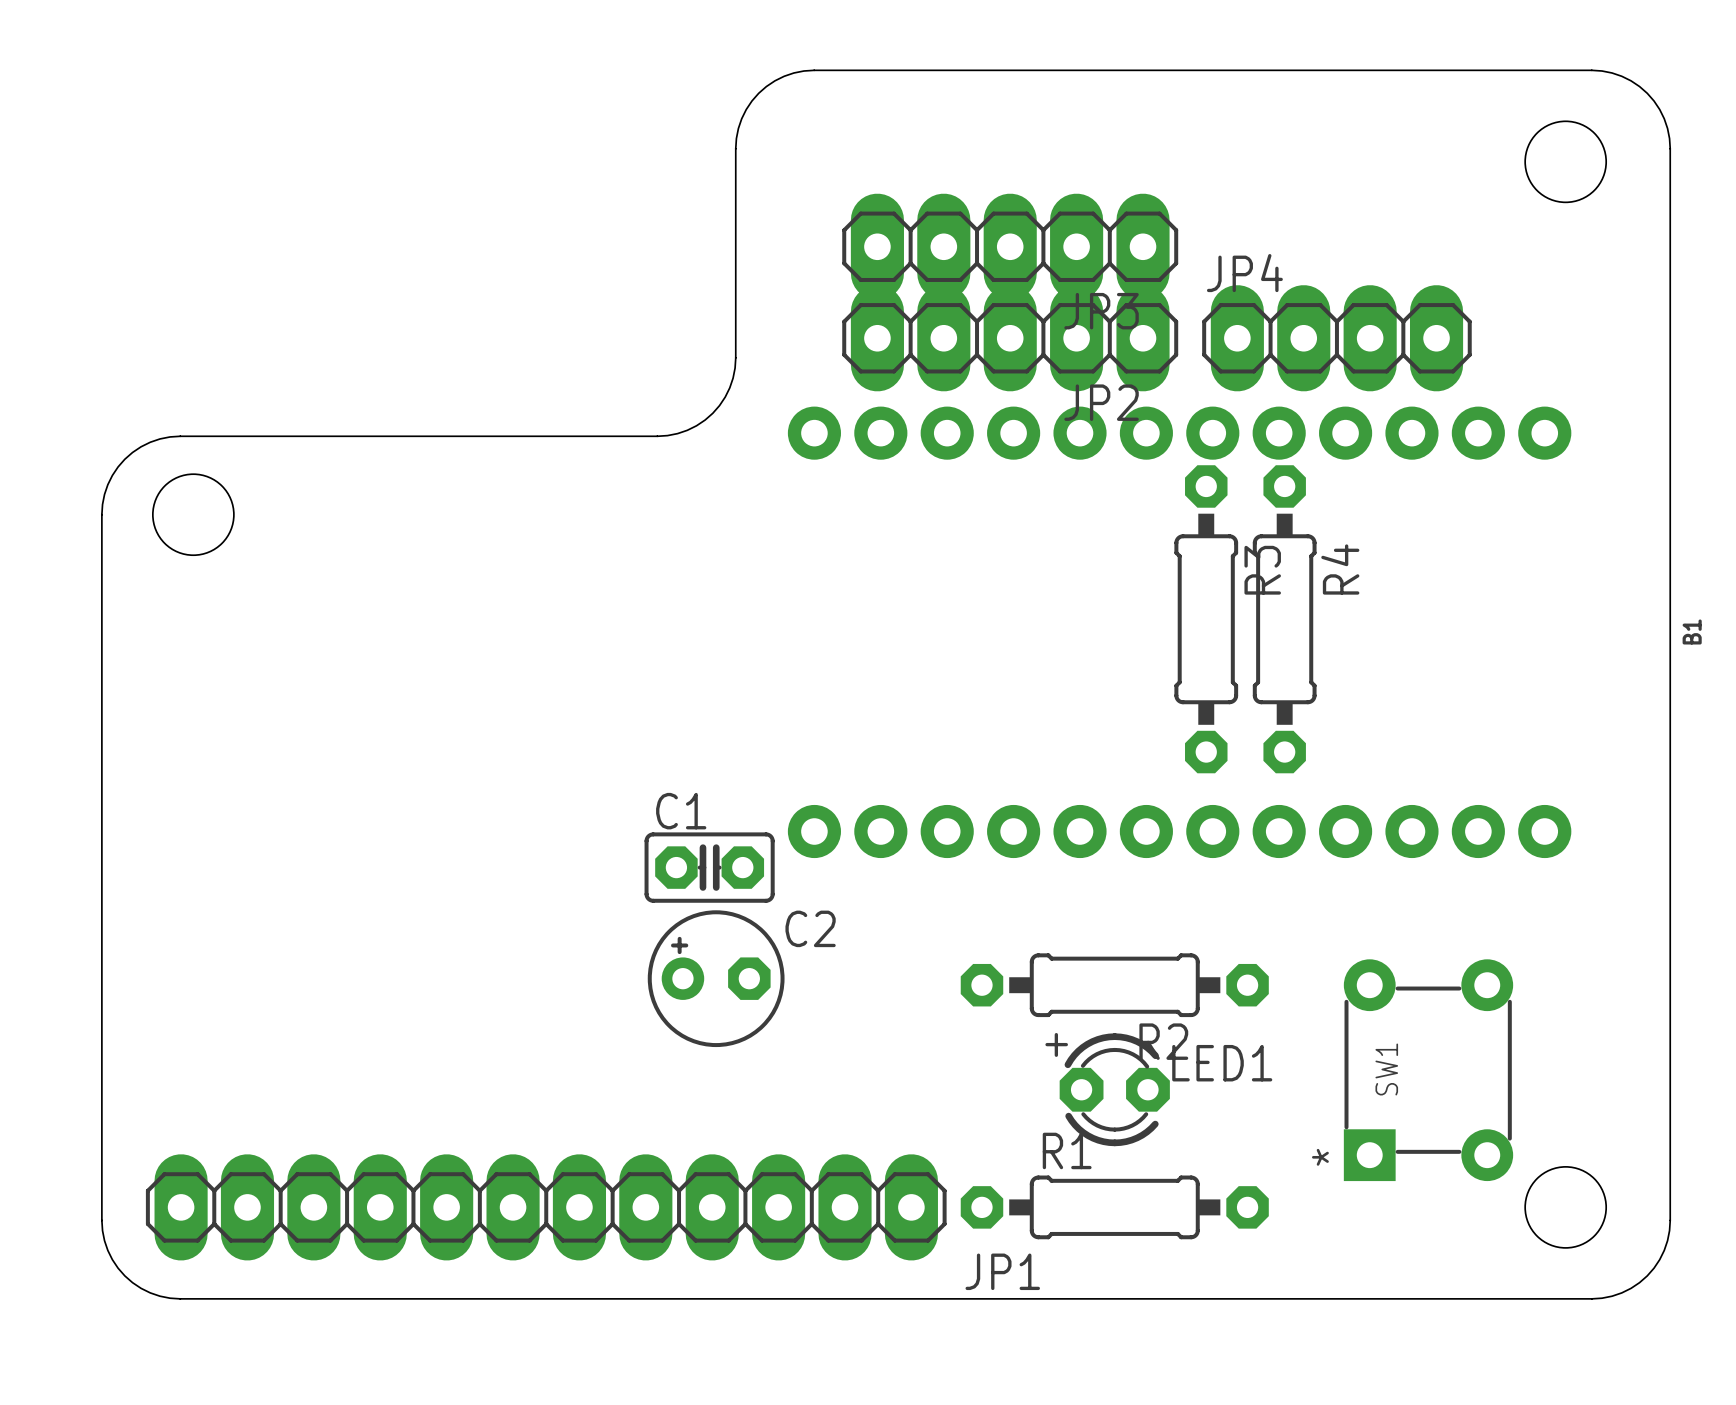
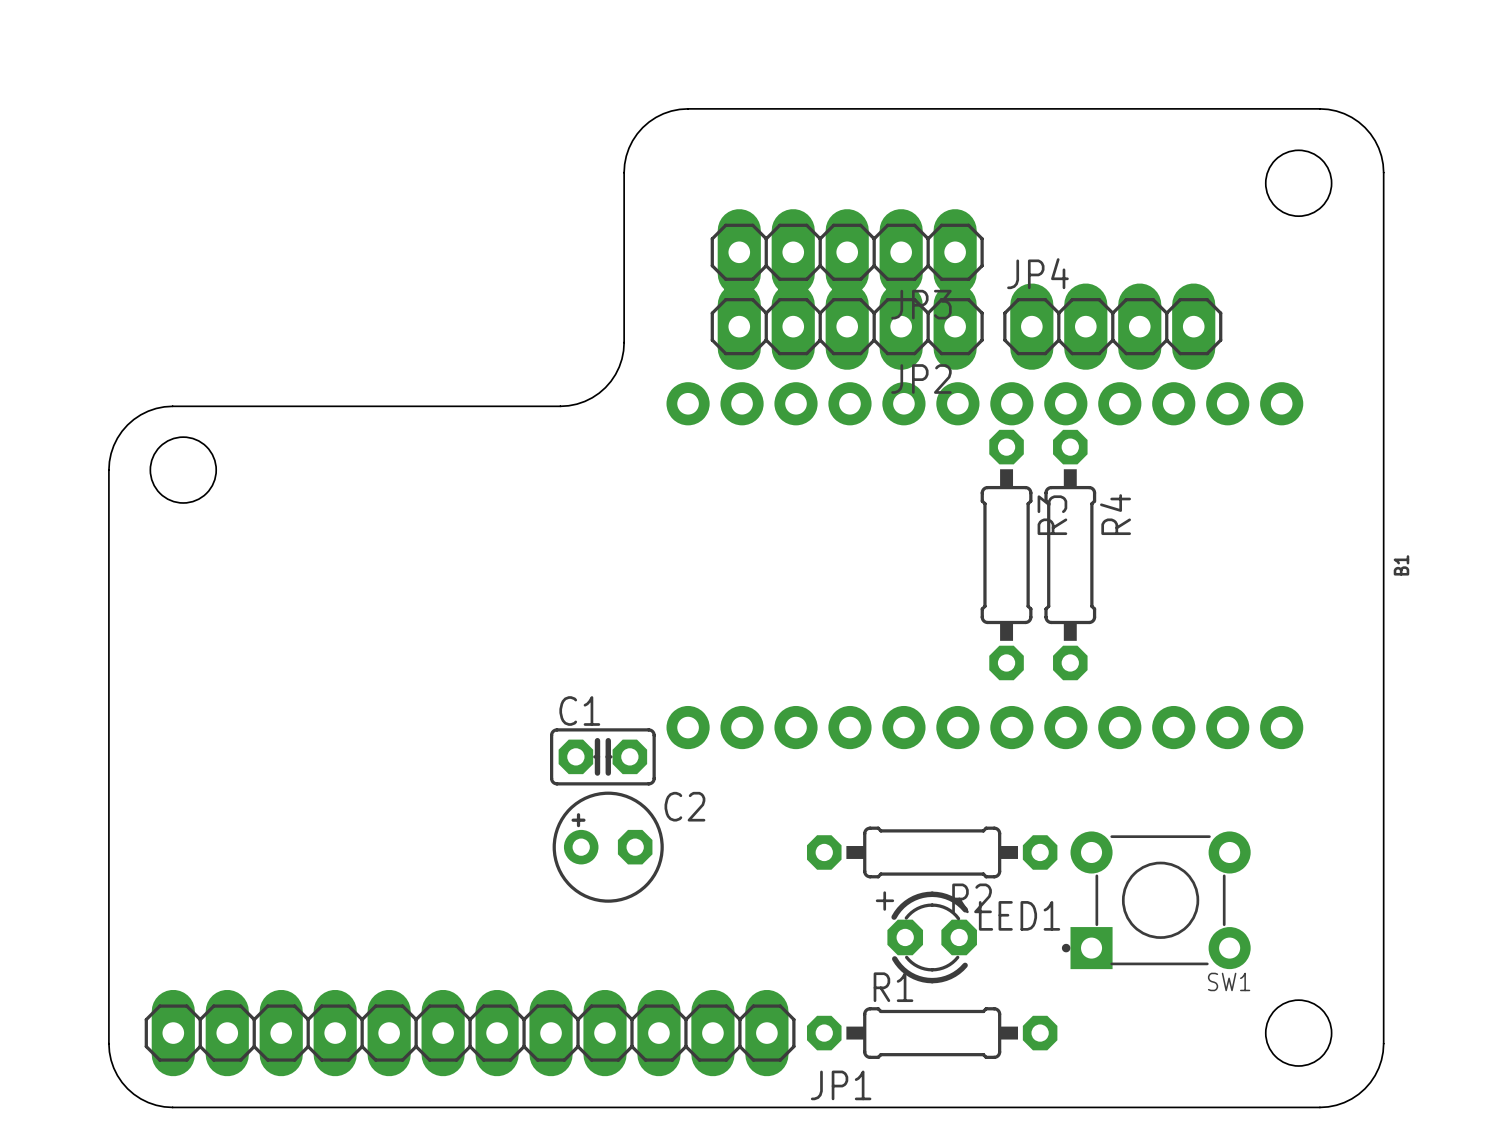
SW1 footprint: [1343, 959, 1514, 1182] -> [1061, 831, 1251, 970]
SW1 name position: SW1 (1386, 1069) -> SW1 (1229, 981)

